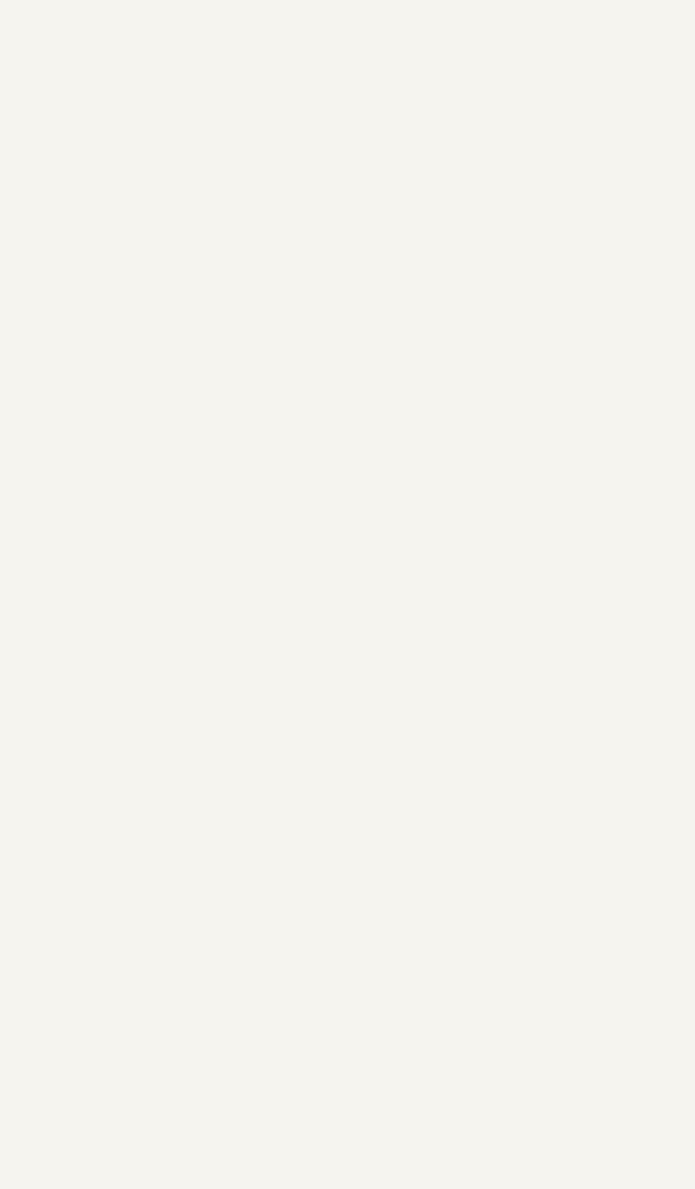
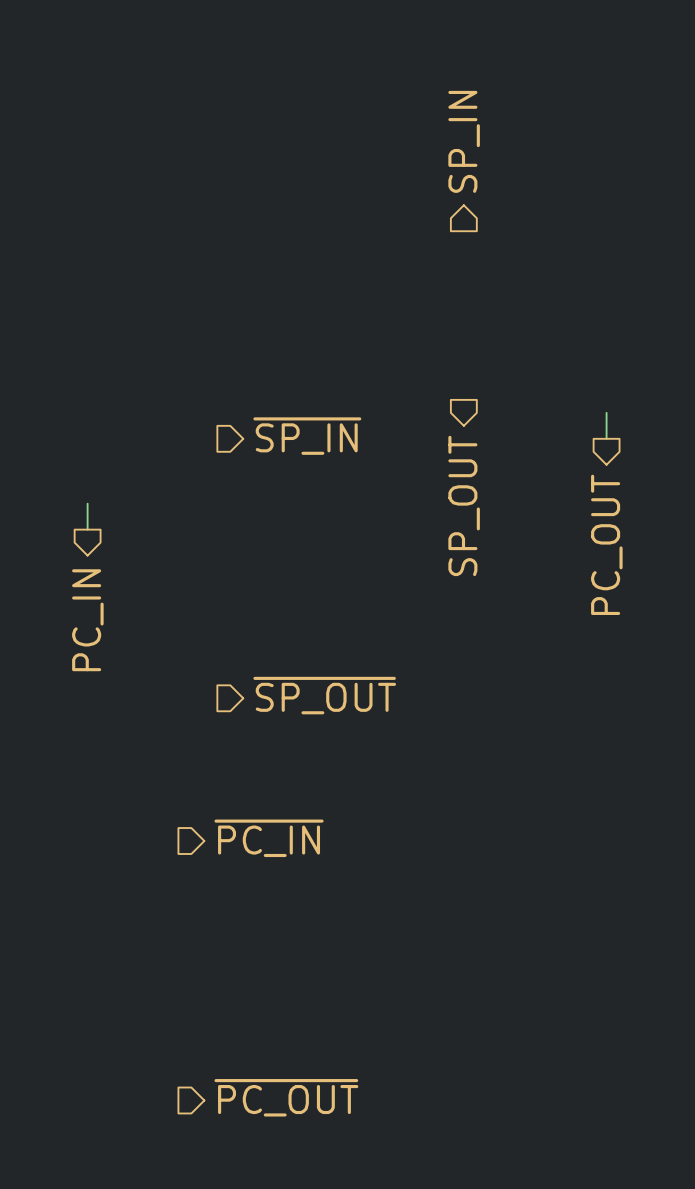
hierarchical label: none -> SP_IN (464, 141)
wire: none -> (606, 412) (606, 438)
hierarchical label: none -> ~{SP_IN} (307, 436)
hierarchical label: none -> SP_OUT (464, 505)
wire: none -> (87, 503) (87, 529)
hierarchical label: none -> PC_OUT (606, 544)
hierarchical label: none -> PC_IN (87, 620)
hierarchical label: none -> ~{SP_OUT} (324, 695)
hierarchical label: none -> ~{PC_IN} (269, 838)
hierarchical label: none -> ~{PC_OUT} (286, 1097)

